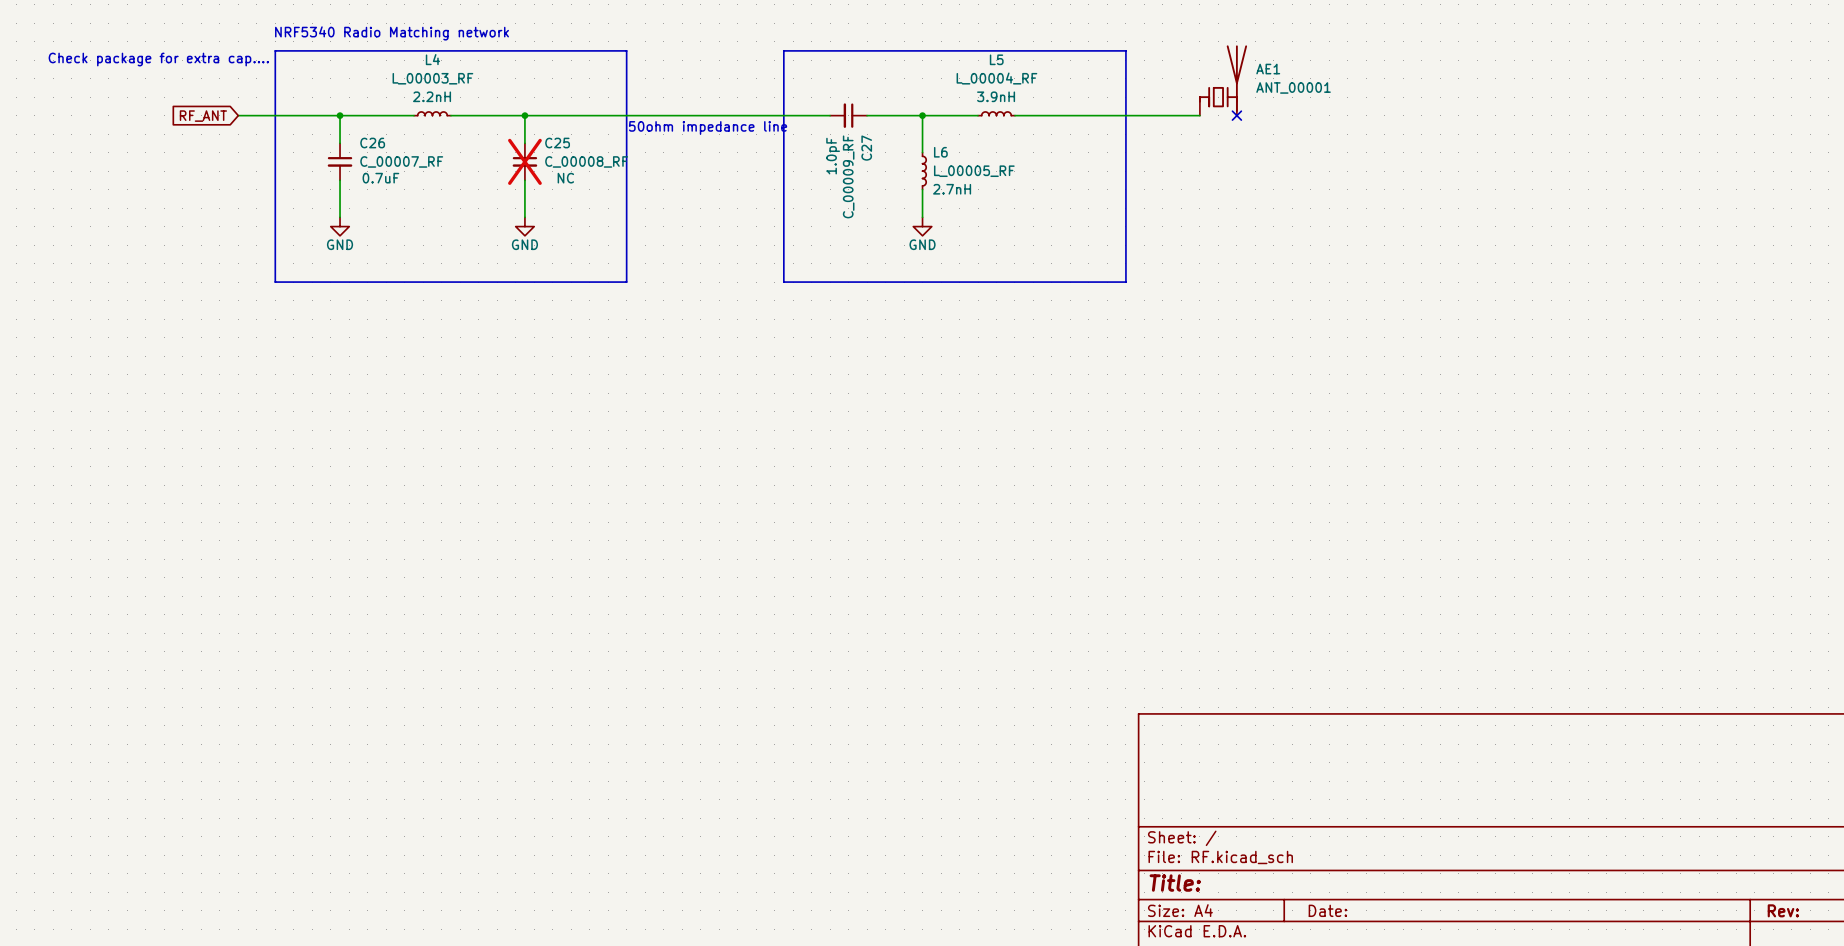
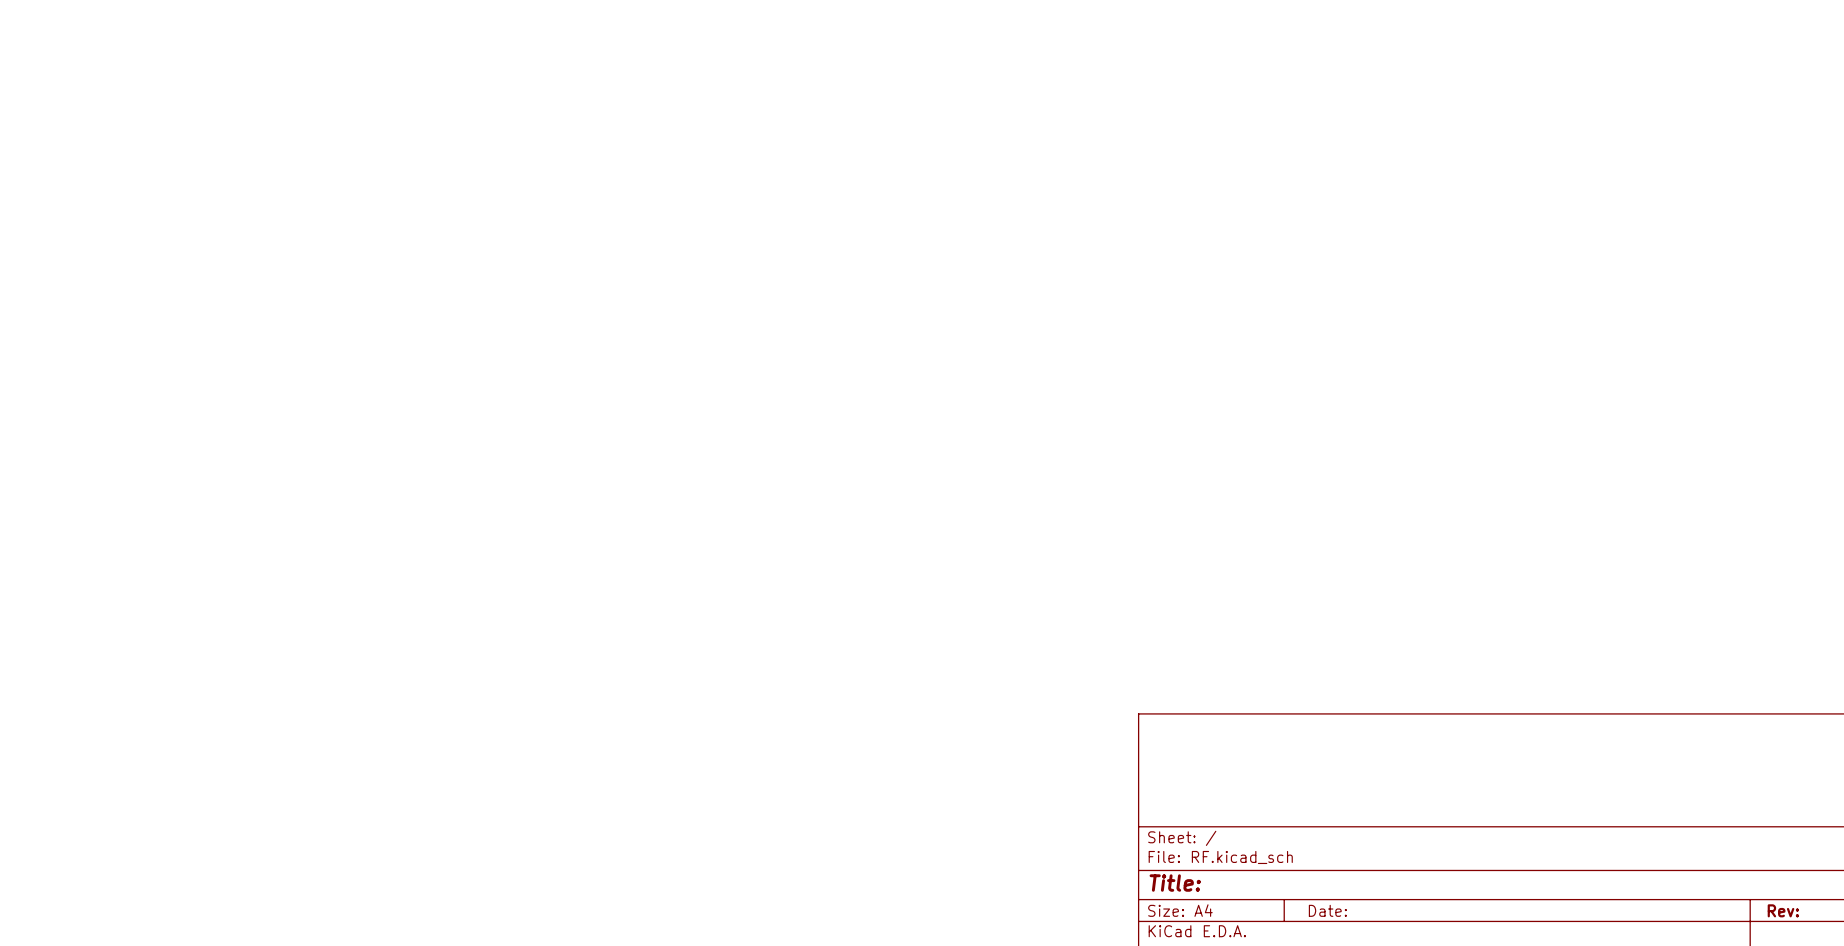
text: NRF5340 Radio Matching network (392, 33) -> none
line: (275, 50) (626, 50) (626, 282) (275, 282) (275, 50) -> none
line: (783, 50) (1125, 50) (1125, 282) (783, 282) (783, 50) -> none
text: Check package for extra cap.... (158, 59) -> none
AE1: ANT_00001 (1223, 80) -> none
L4: L_00003_RF (432, 113) -> none
L5: L_00004_RF (996, 113) -> none
wire: (238, 115) (413, 115) -> none
wire: (340, 115) (340, 143) -> none
junction: (340, 115) -> none
wire: (450, 115) (830, 115) -> none
wire: (524, 115) (524, 143) -> none
junction: (524, 115) -> none
C27: C_00009_RF (848, 115) -> none
wire: (867, 115) (978, 115) -> none
wire: (922, 115) (922, 152) -> none
junction: (922, 115) -> none
wire: (1014, 115) (1199, 115) -> none
no-connect mark: (1236, 115) -> none
global label: RF_ANT (203, 116) -> none
text: 50ohm impedance line (708, 127) -> none
C26: C_00007_RF (340, 161) -> none
C25: C_00008_RF (524, 161) -> none
L6: L_00005_RF (924, 171) -> none
wire: (340, 180) (340, 217) -> none
wire: (524, 180) (524, 217) -> none
wire: (922, 189) (922, 217) -> none
power symbol: GND (340, 226) -> none
power symbol: GND (524, 226) -> none
power symbol: GND (922, 226) -> none

